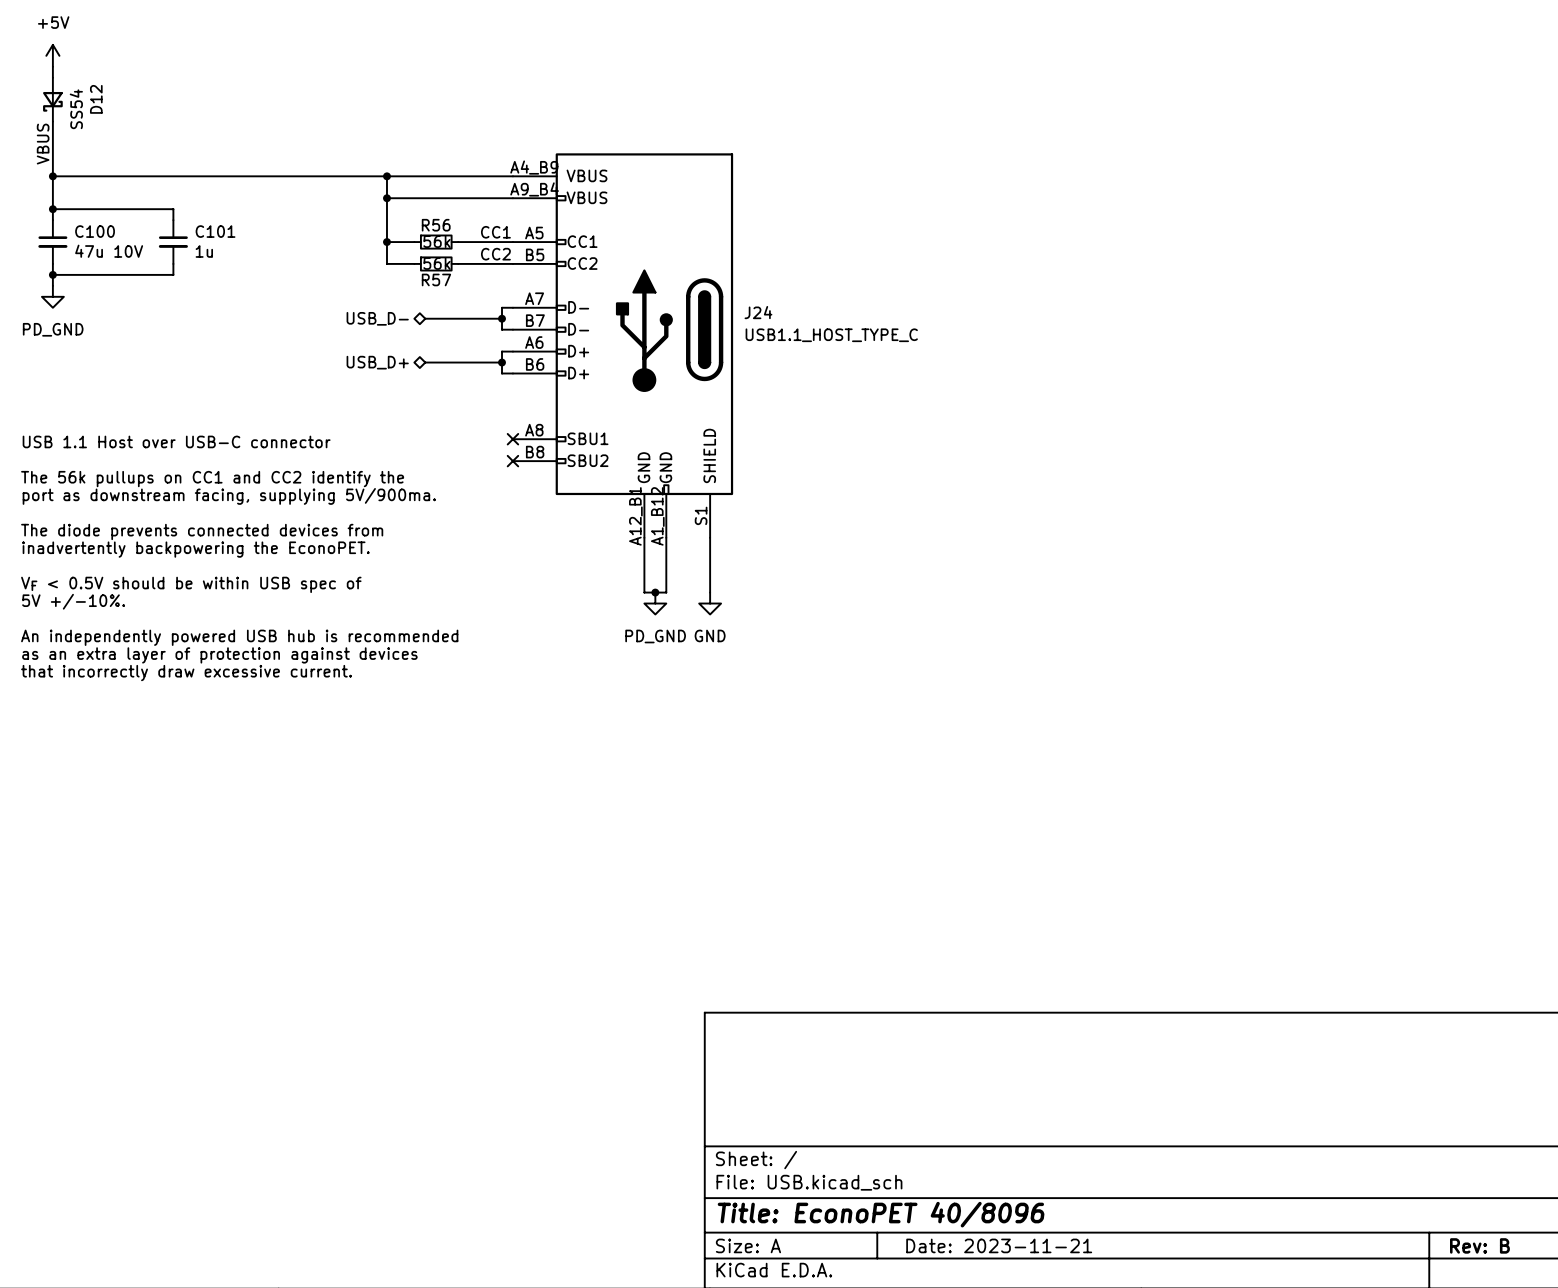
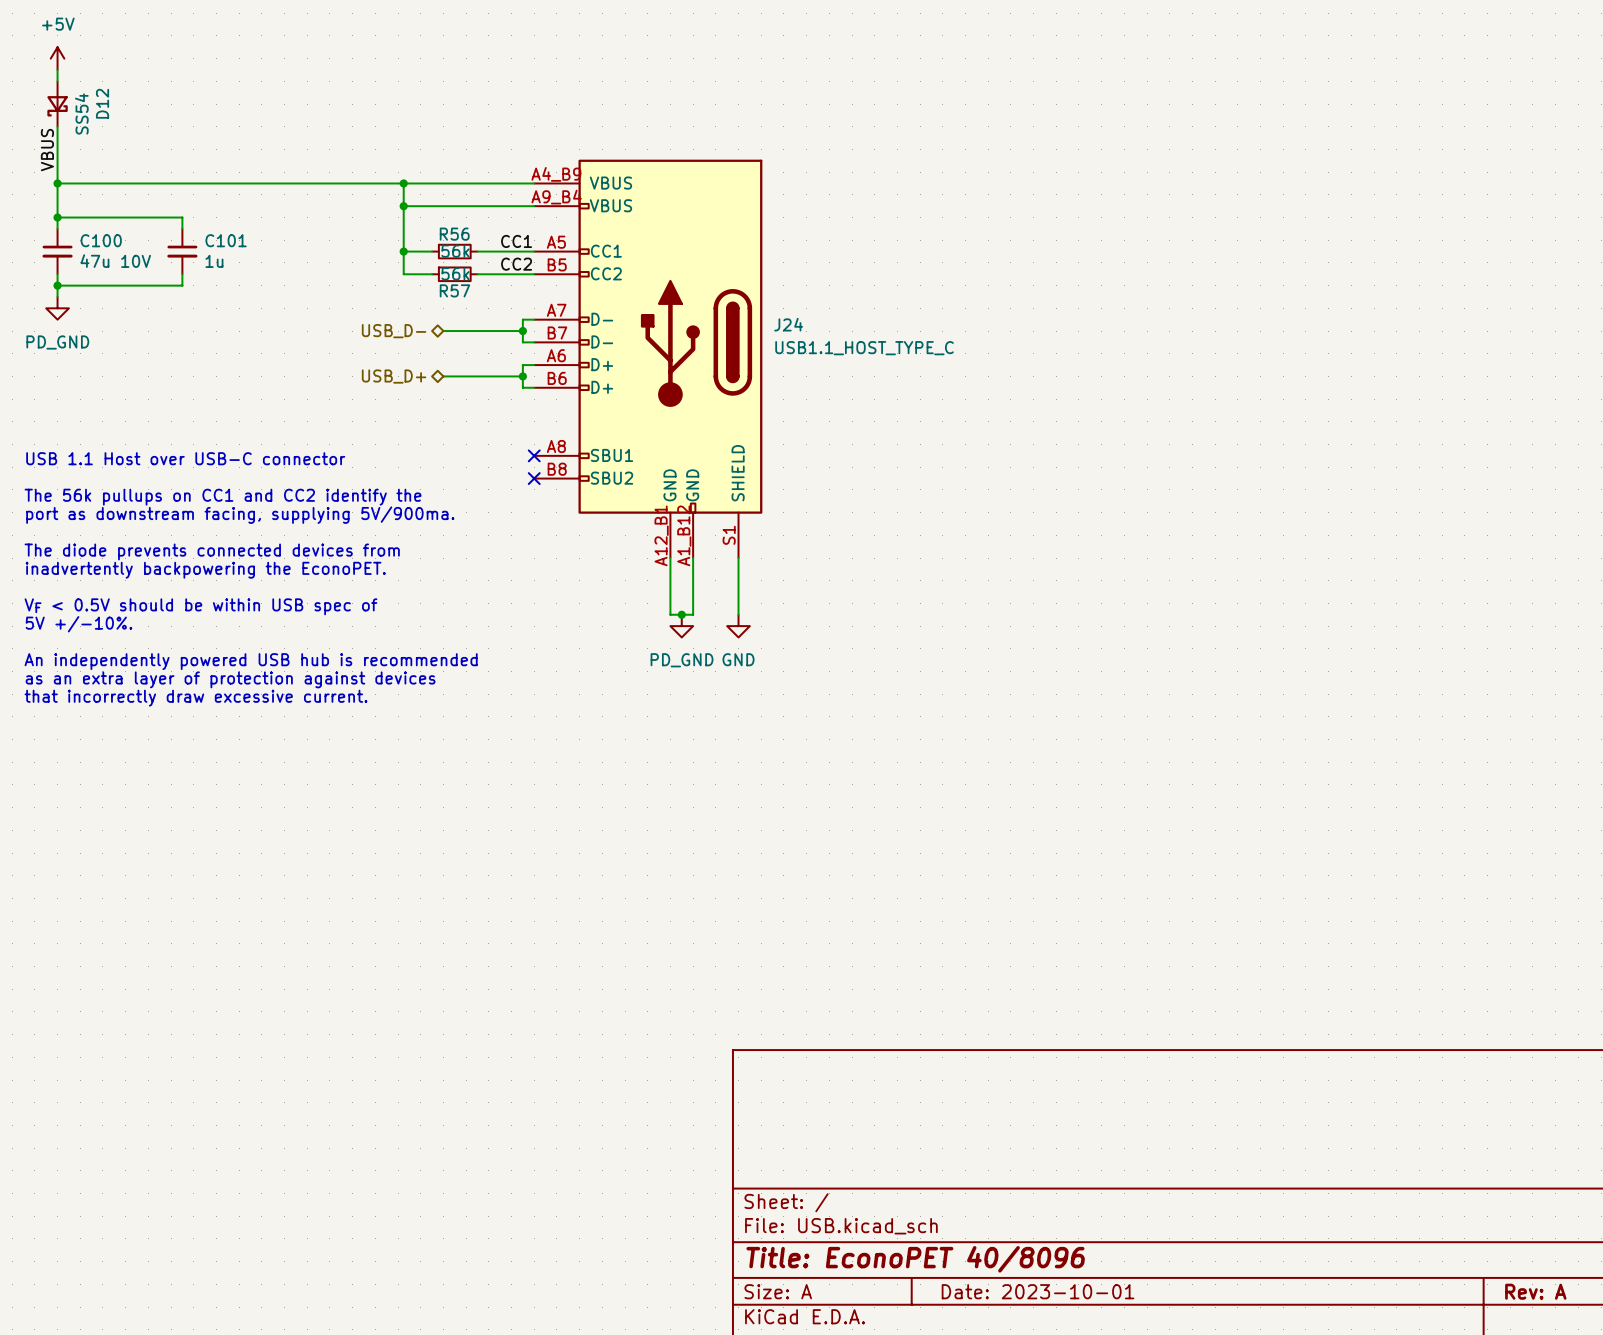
title block: Date: 2023-11-21 (999, 1245) -> Date: 2023-10-01 (1038, 1291)
title block: Rev: B (1479, 1245) -> Rev: A (1535, 1291)

